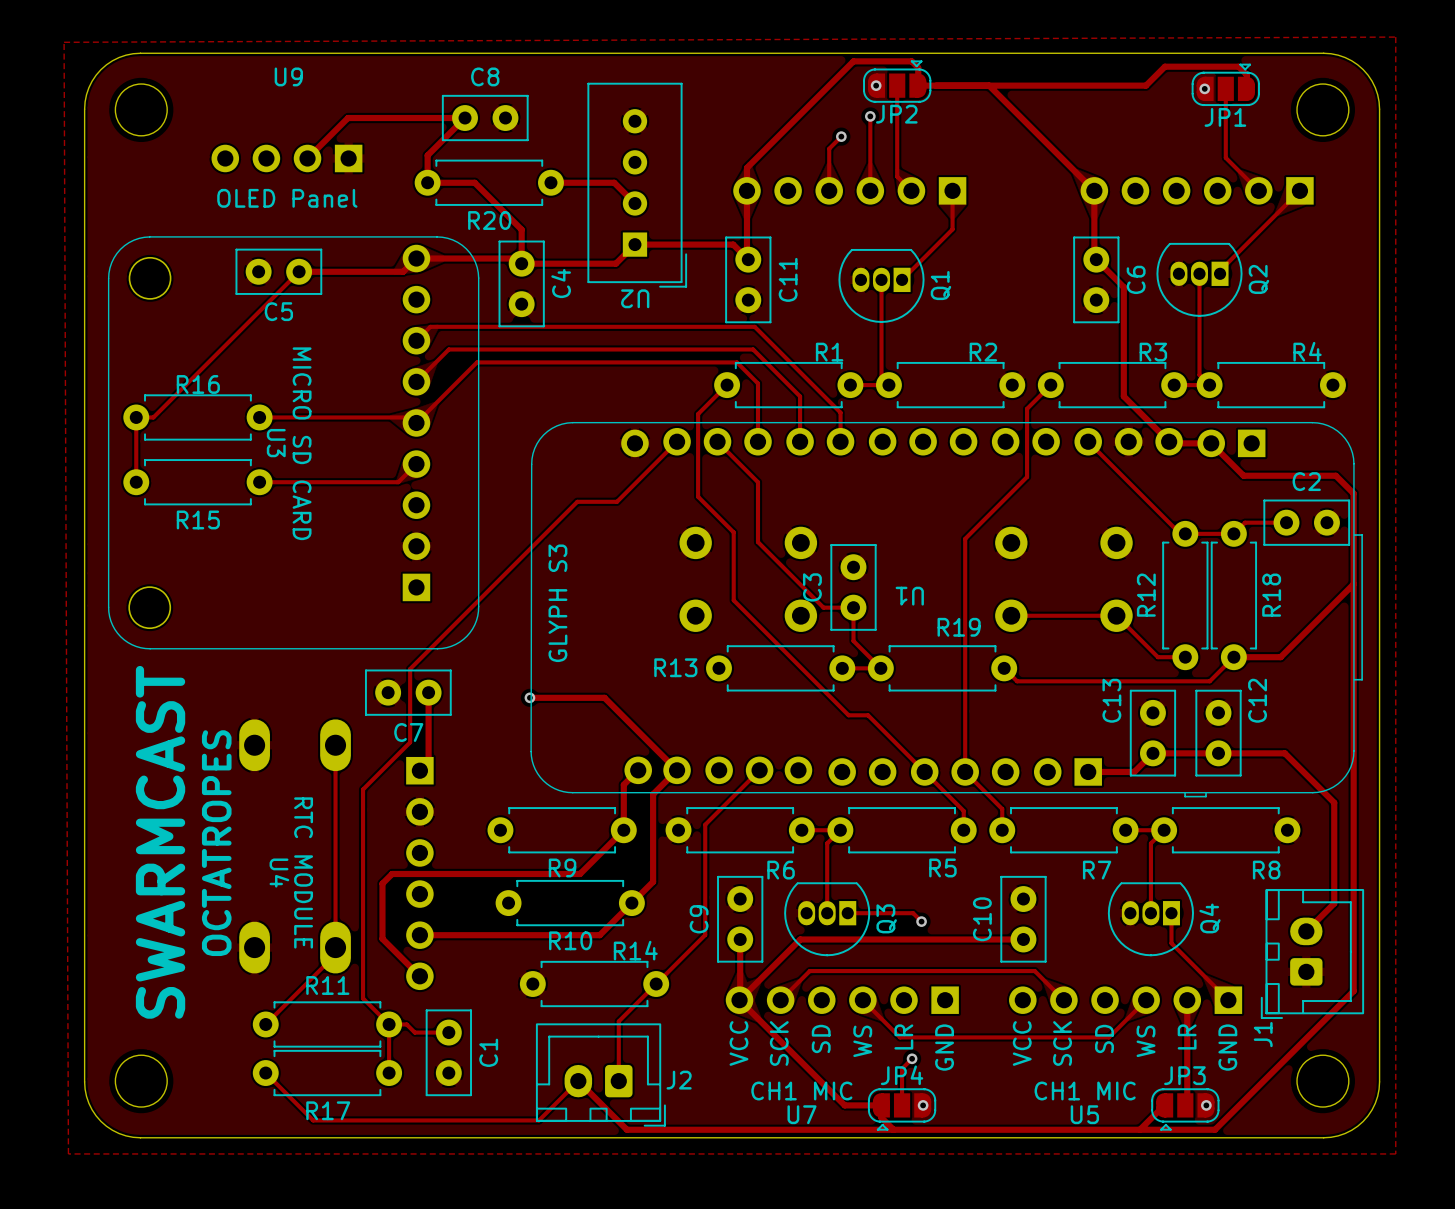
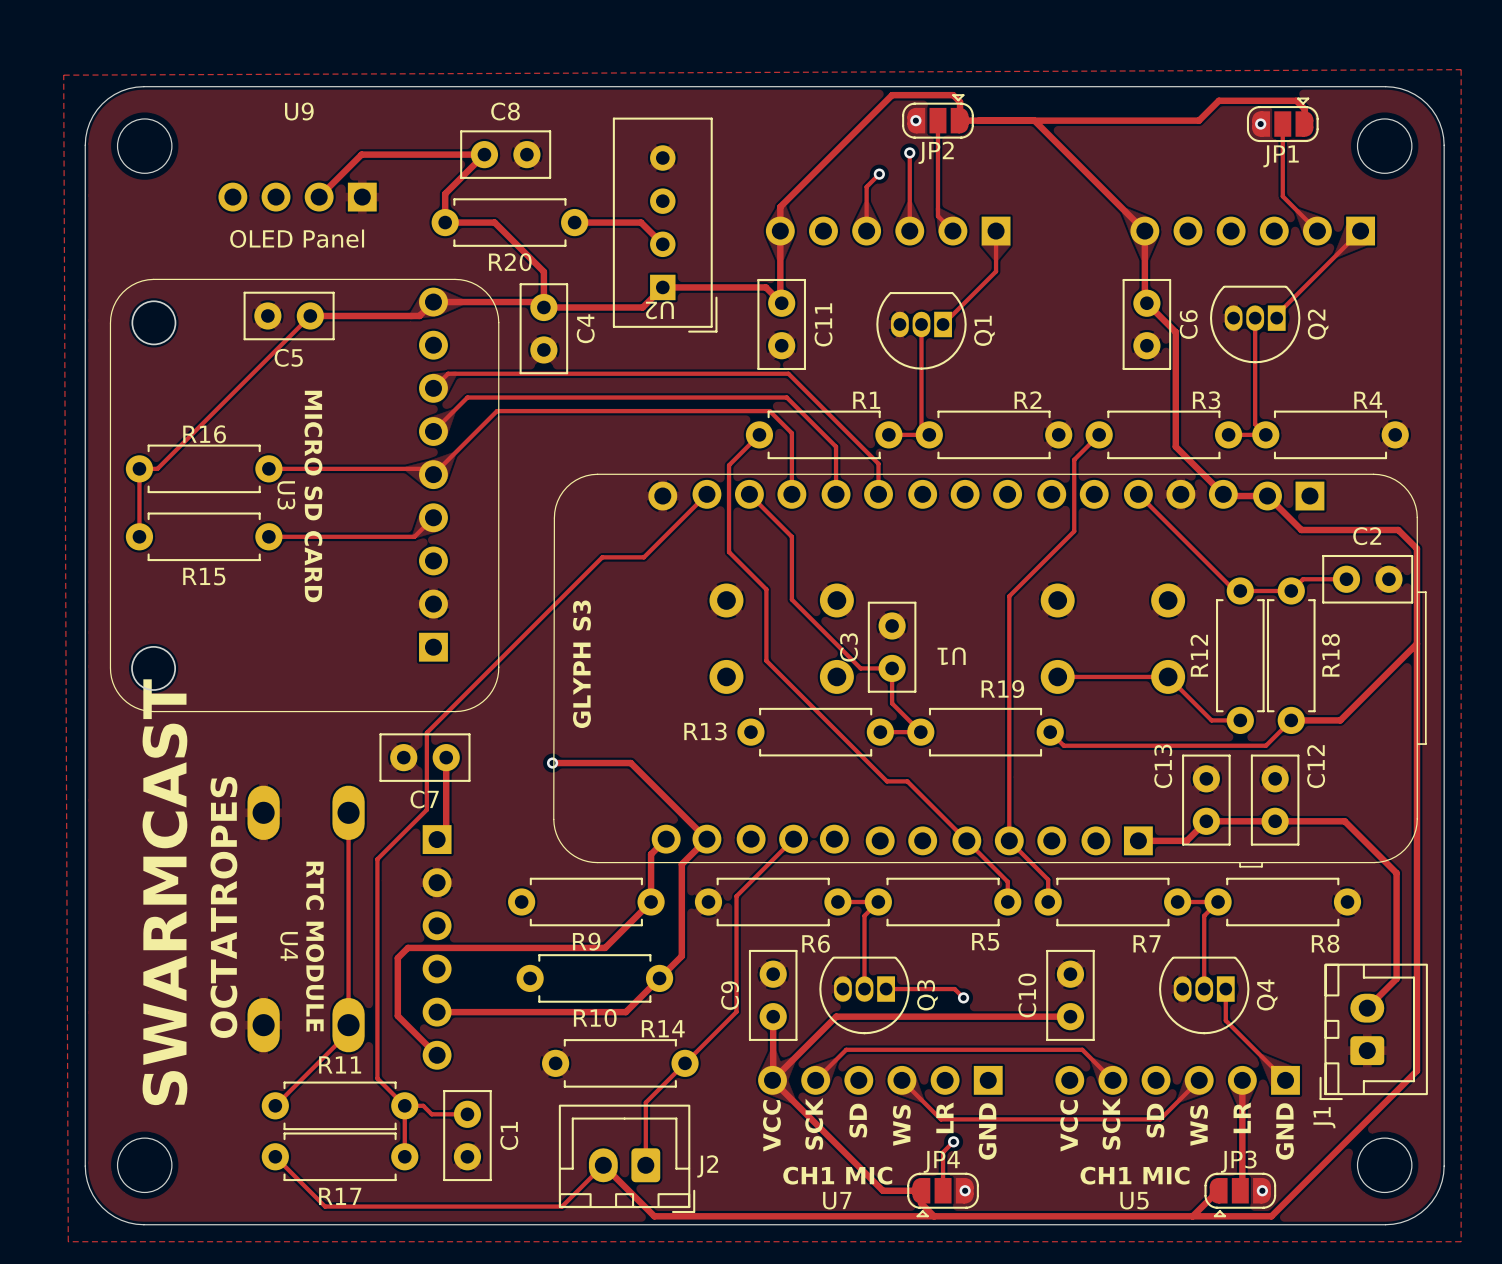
U2 name position: U2 (635, 298) -> U2 (659, 310)

